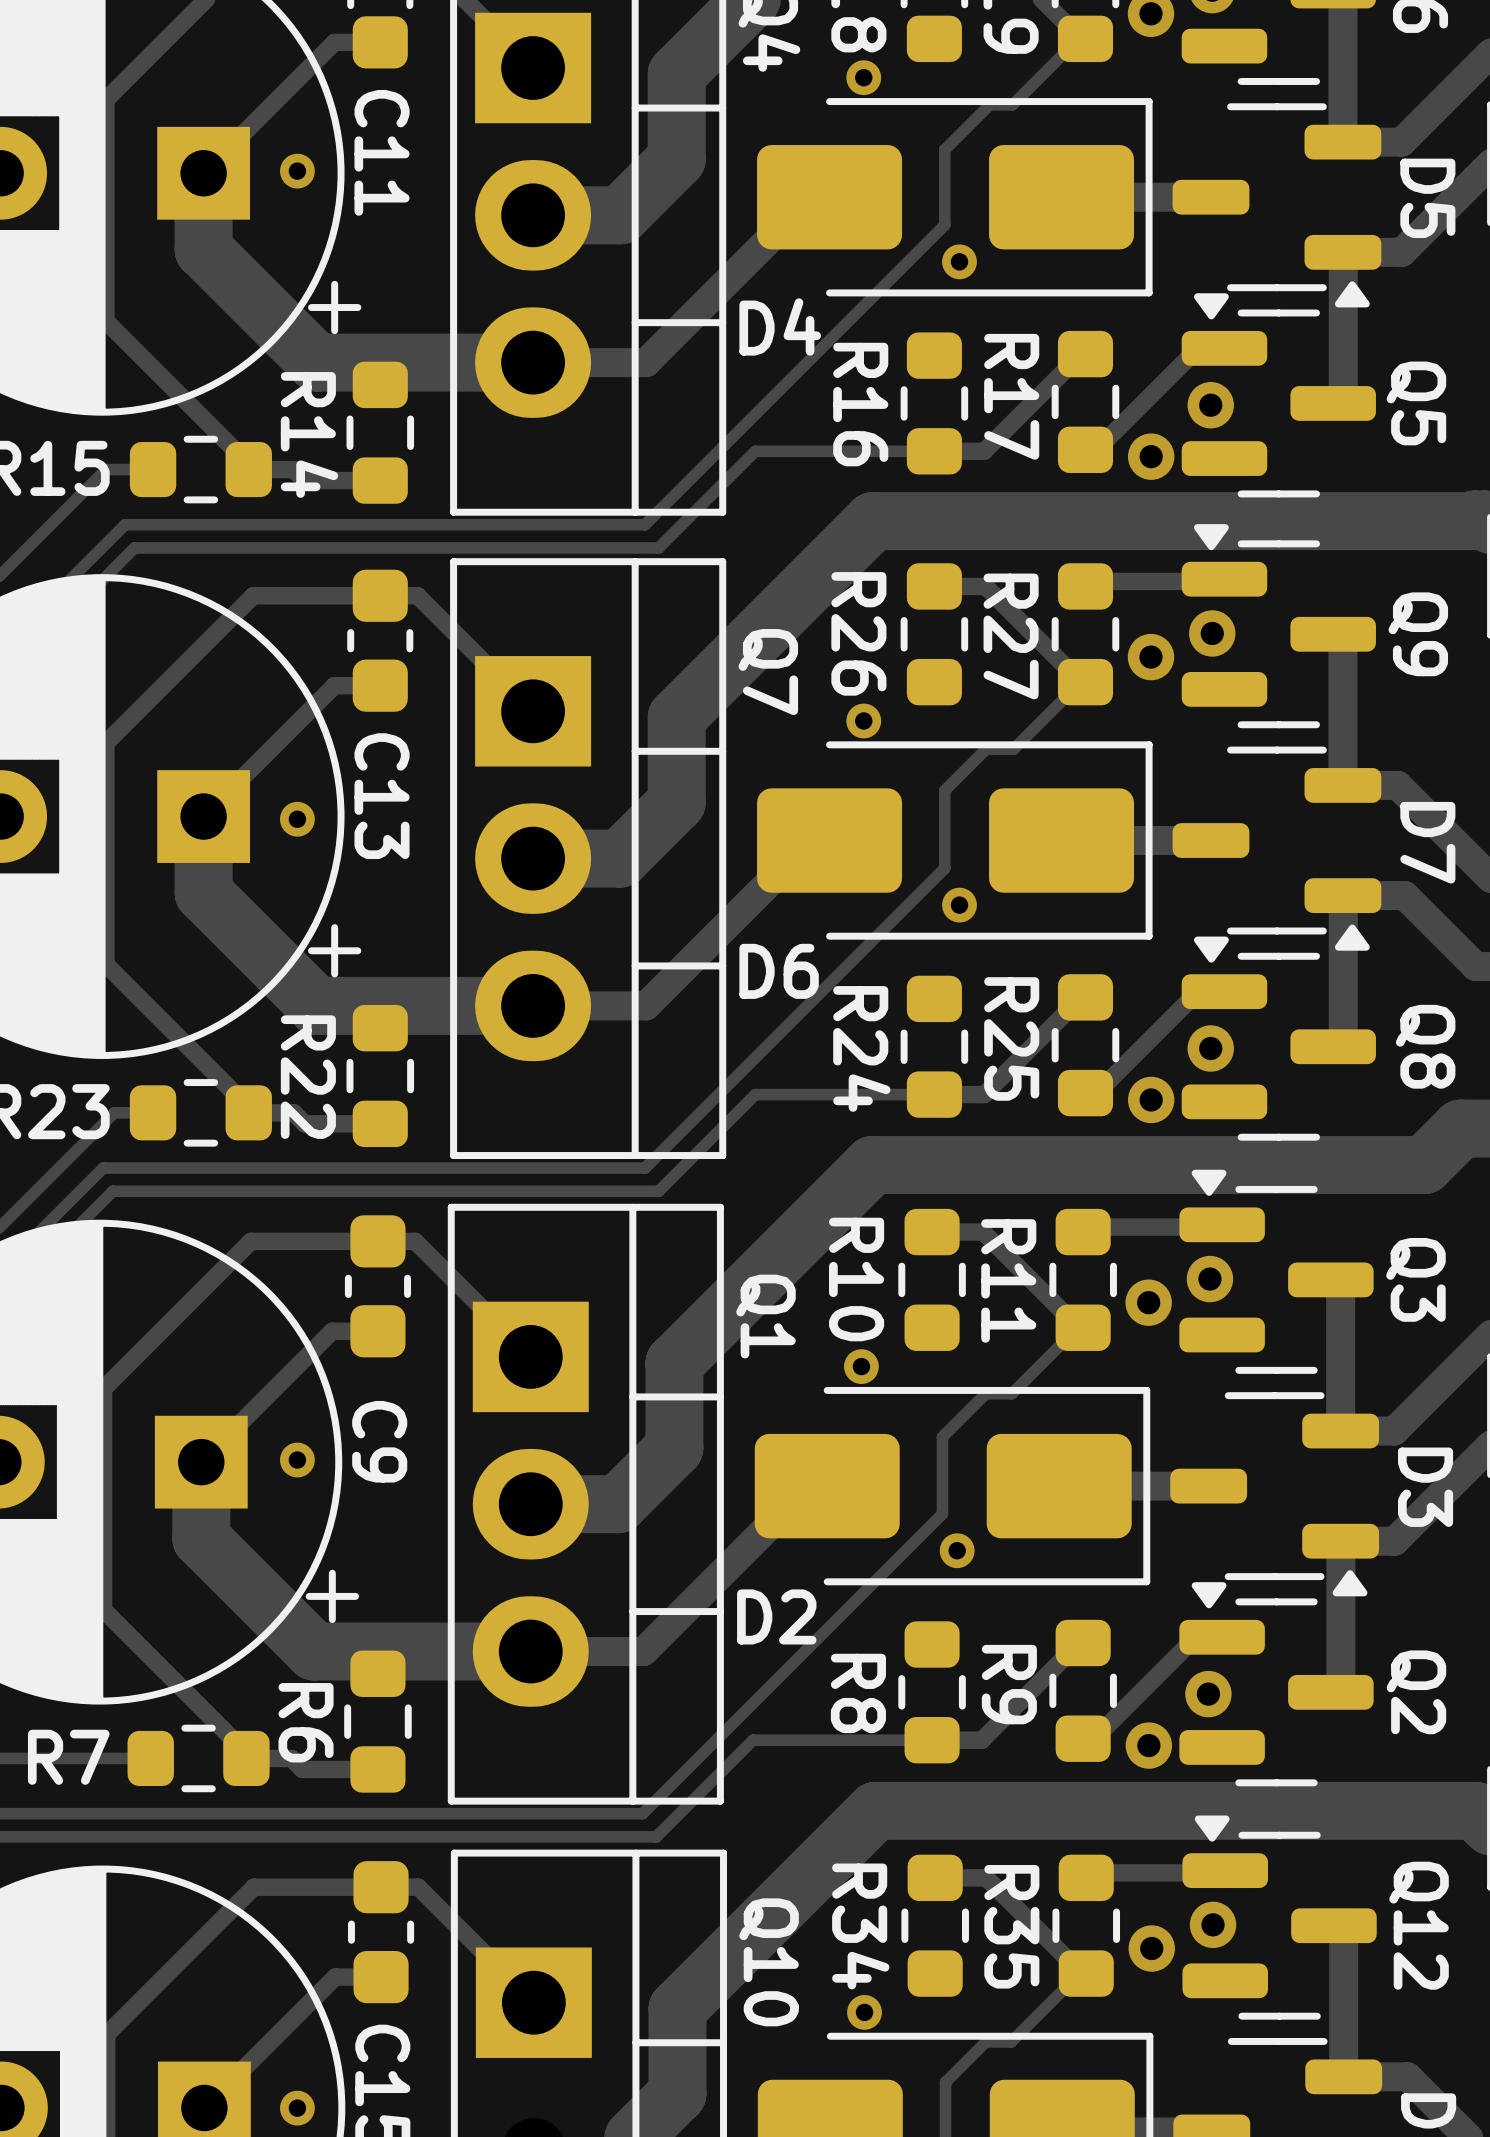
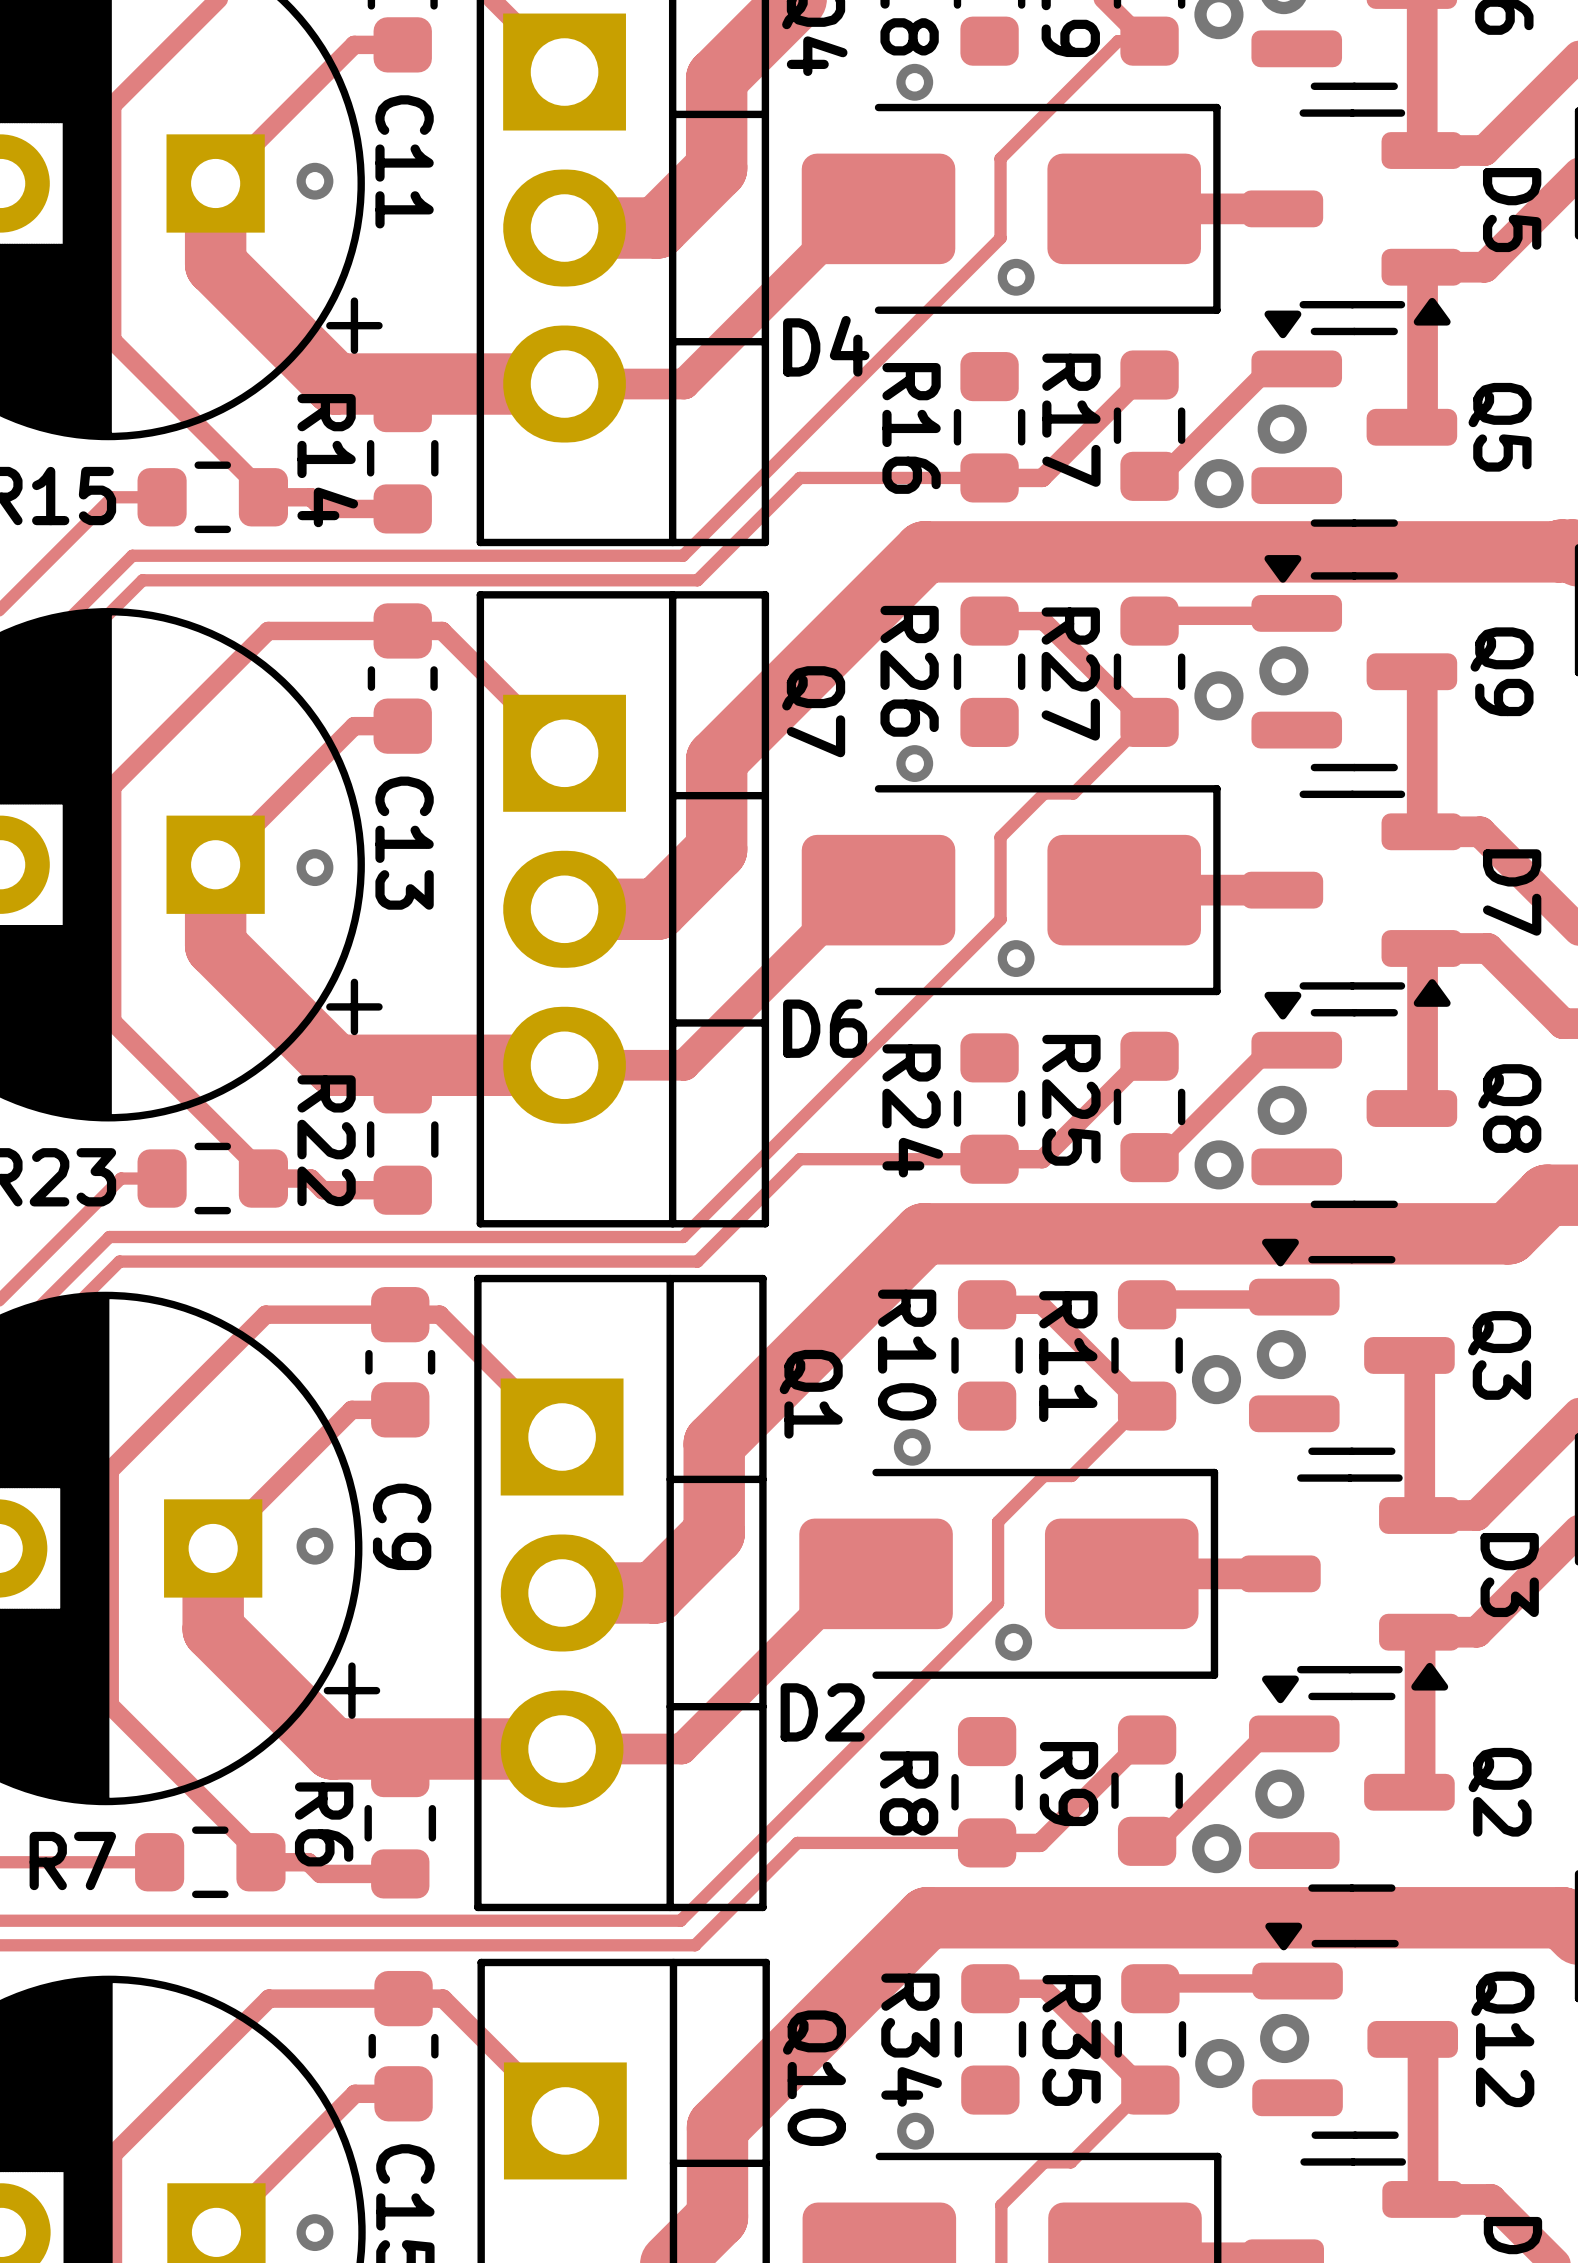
track: (1078, 38) (1012, 104) (989, 104) -> (1142, 41) (1118, 41) (1048, 111)

